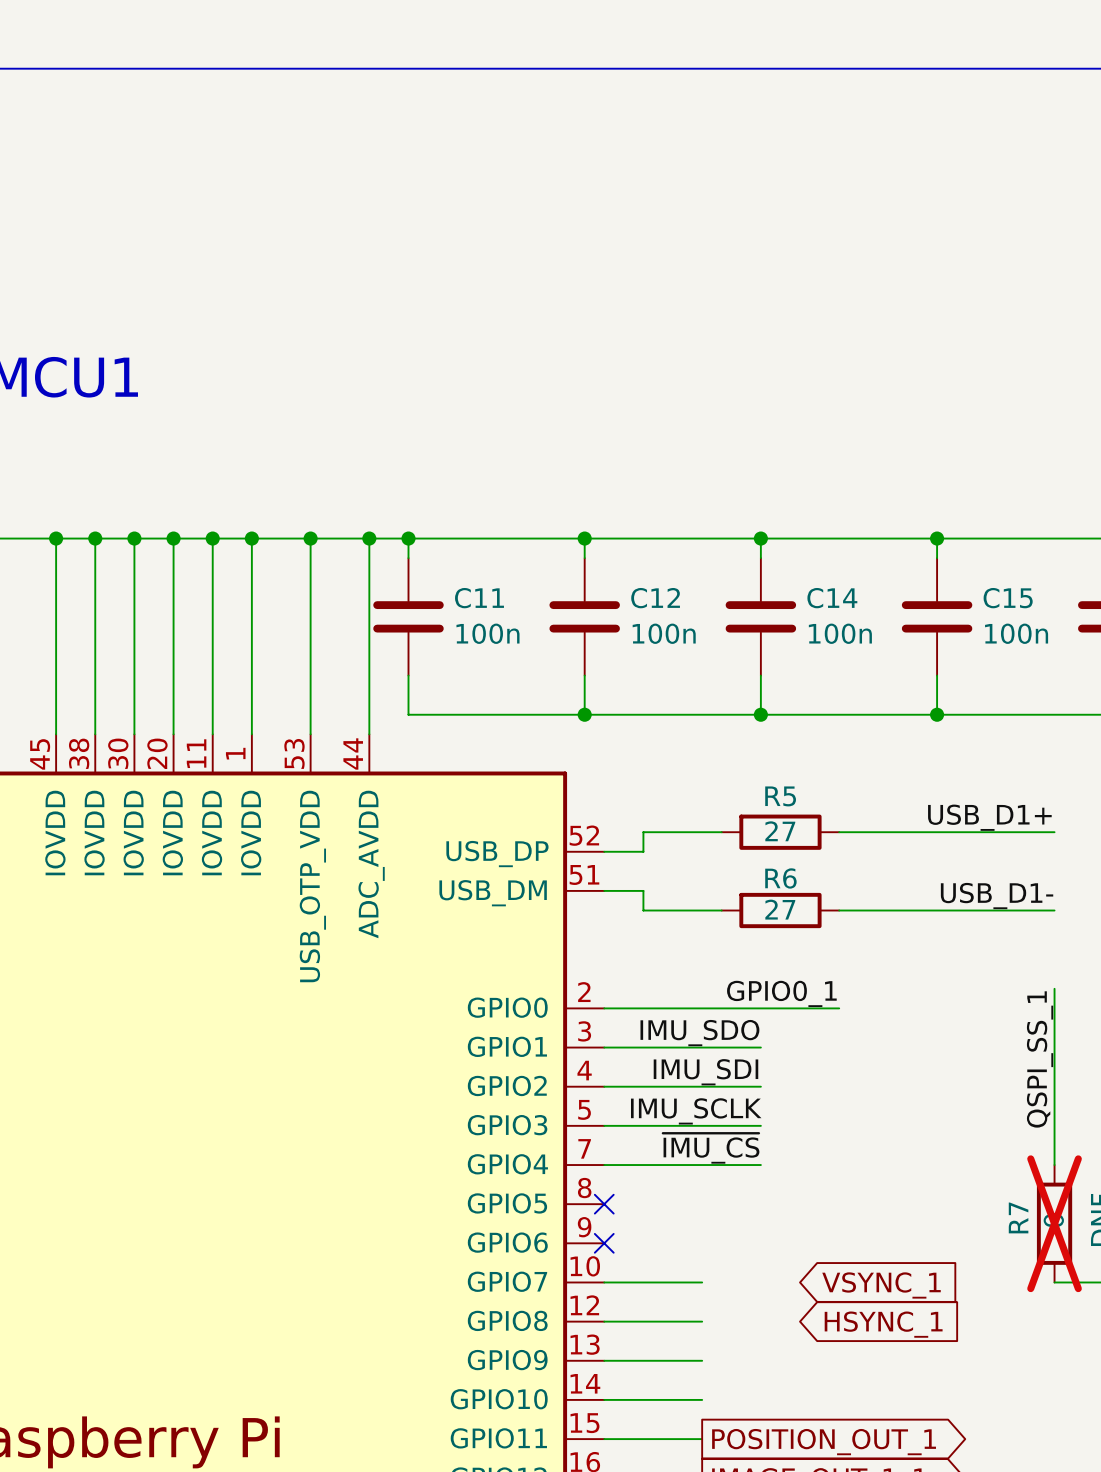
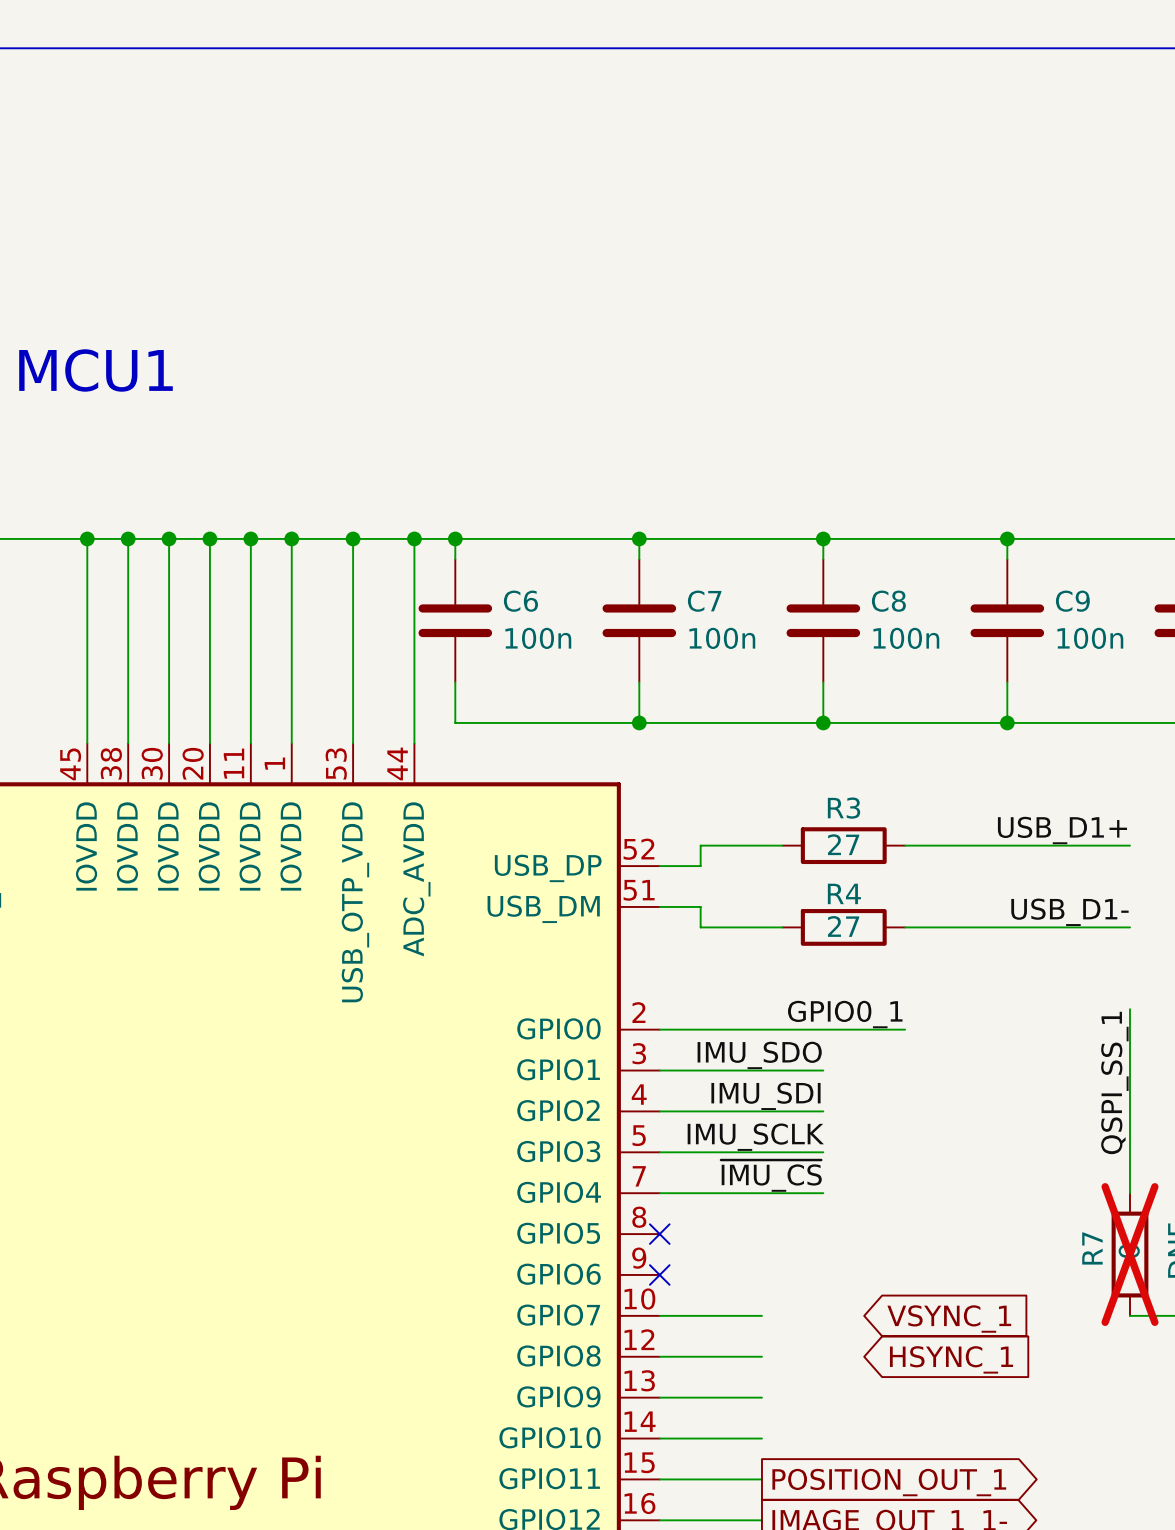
C11 name: C11 (479, 598) -> C6 (520, 601)
C12 name: C12 (655, 598) -> C7 (704, 601)
C14 name: C14 (832, 598) -> C8 (888, 601)
C15 name: C15 (1008, 598) -> C9 (1072, 601)
R5 name: R5 (780, 796) -> R3 (844, 808)
R6 name: R6 (780, 878) -> R4 (844, 893)

